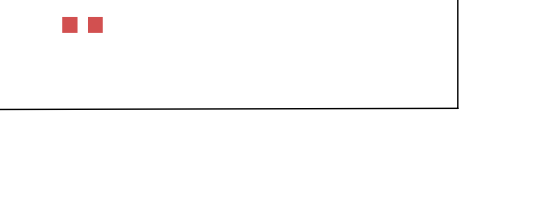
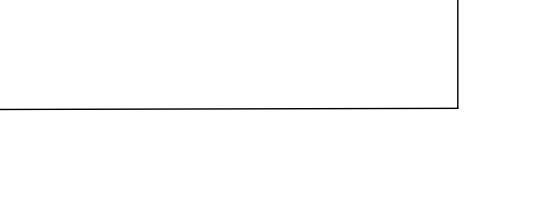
part: (82, 24) -> none

